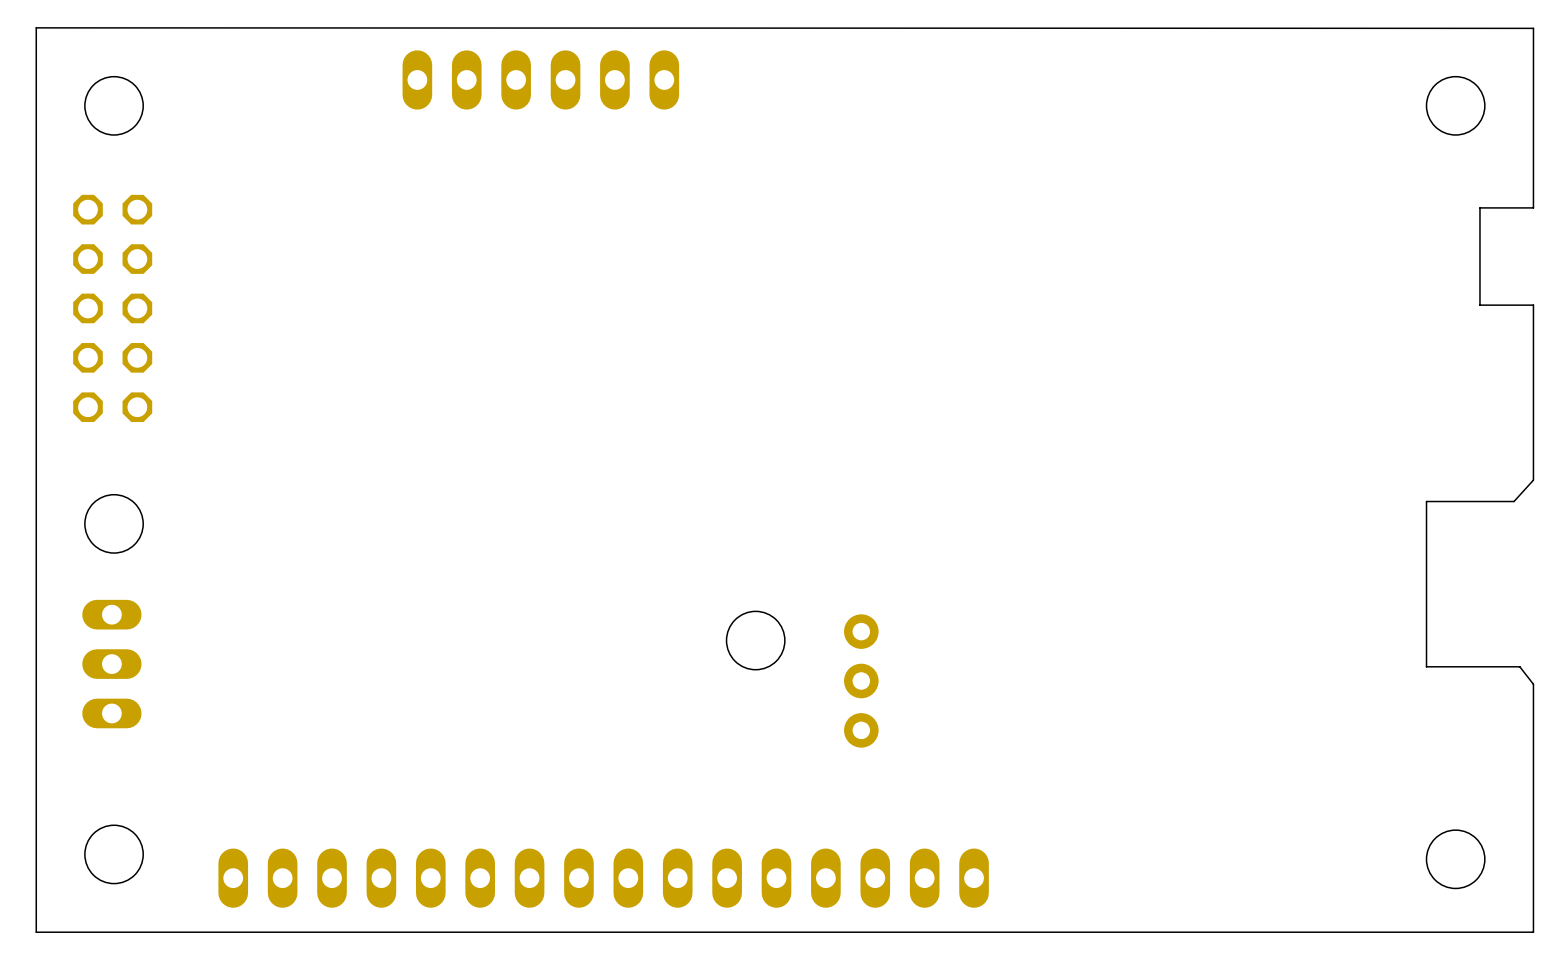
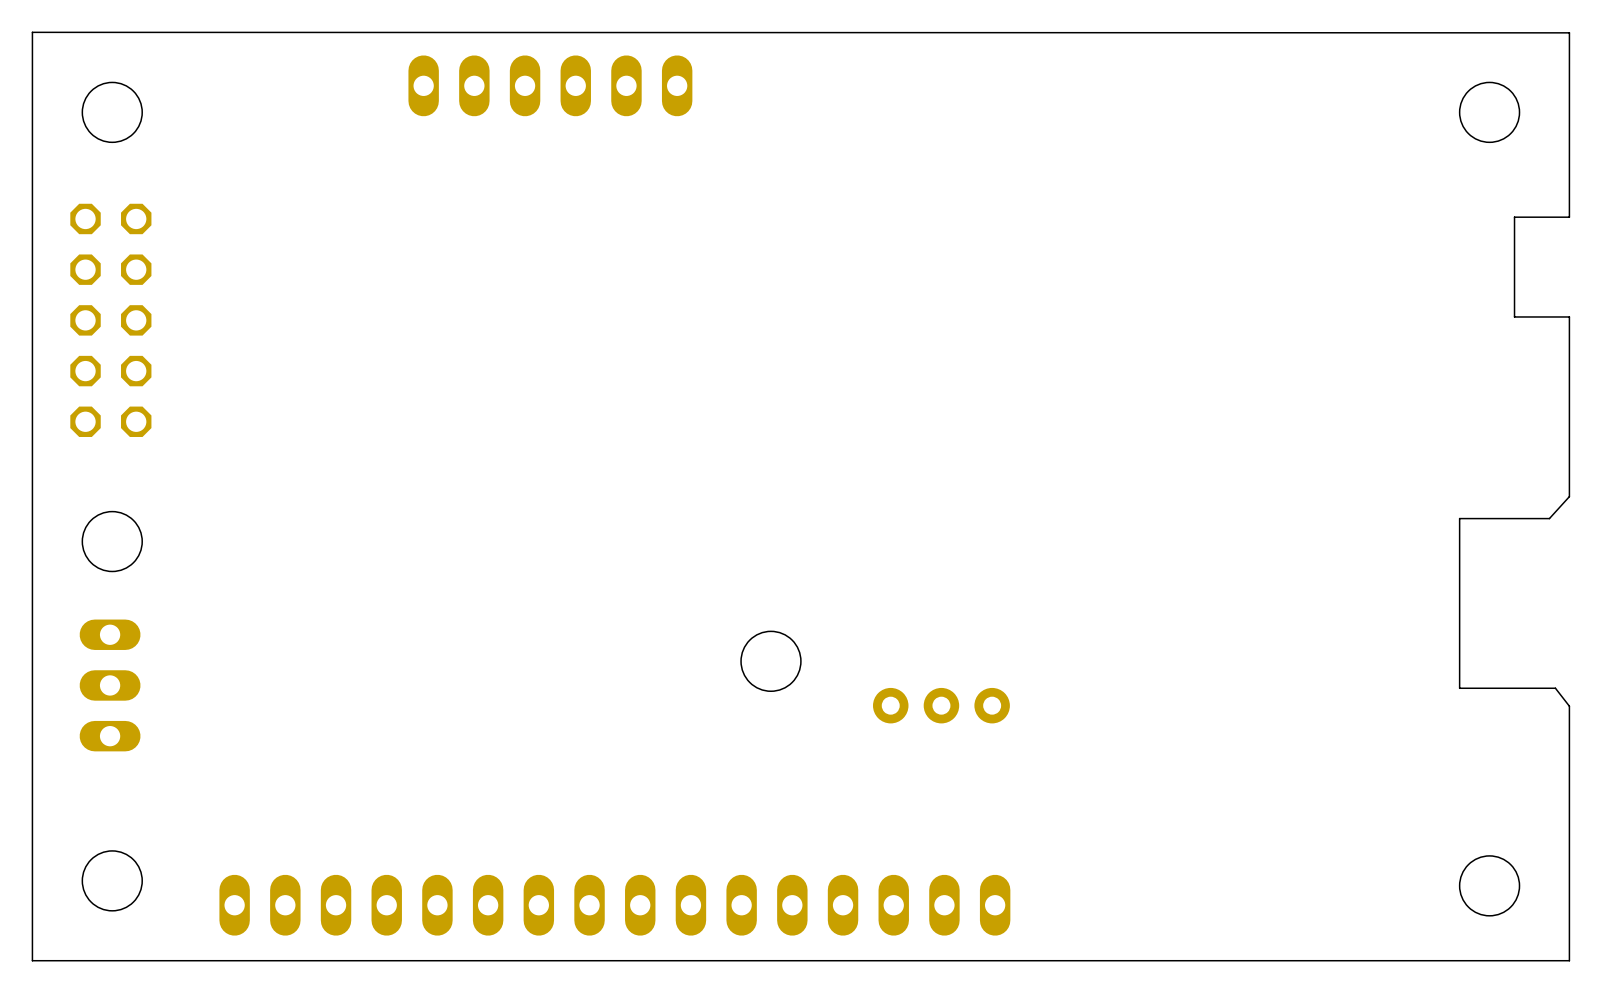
part rotation: 0° (861, 680) -> 90° clockwise (941, 705)

